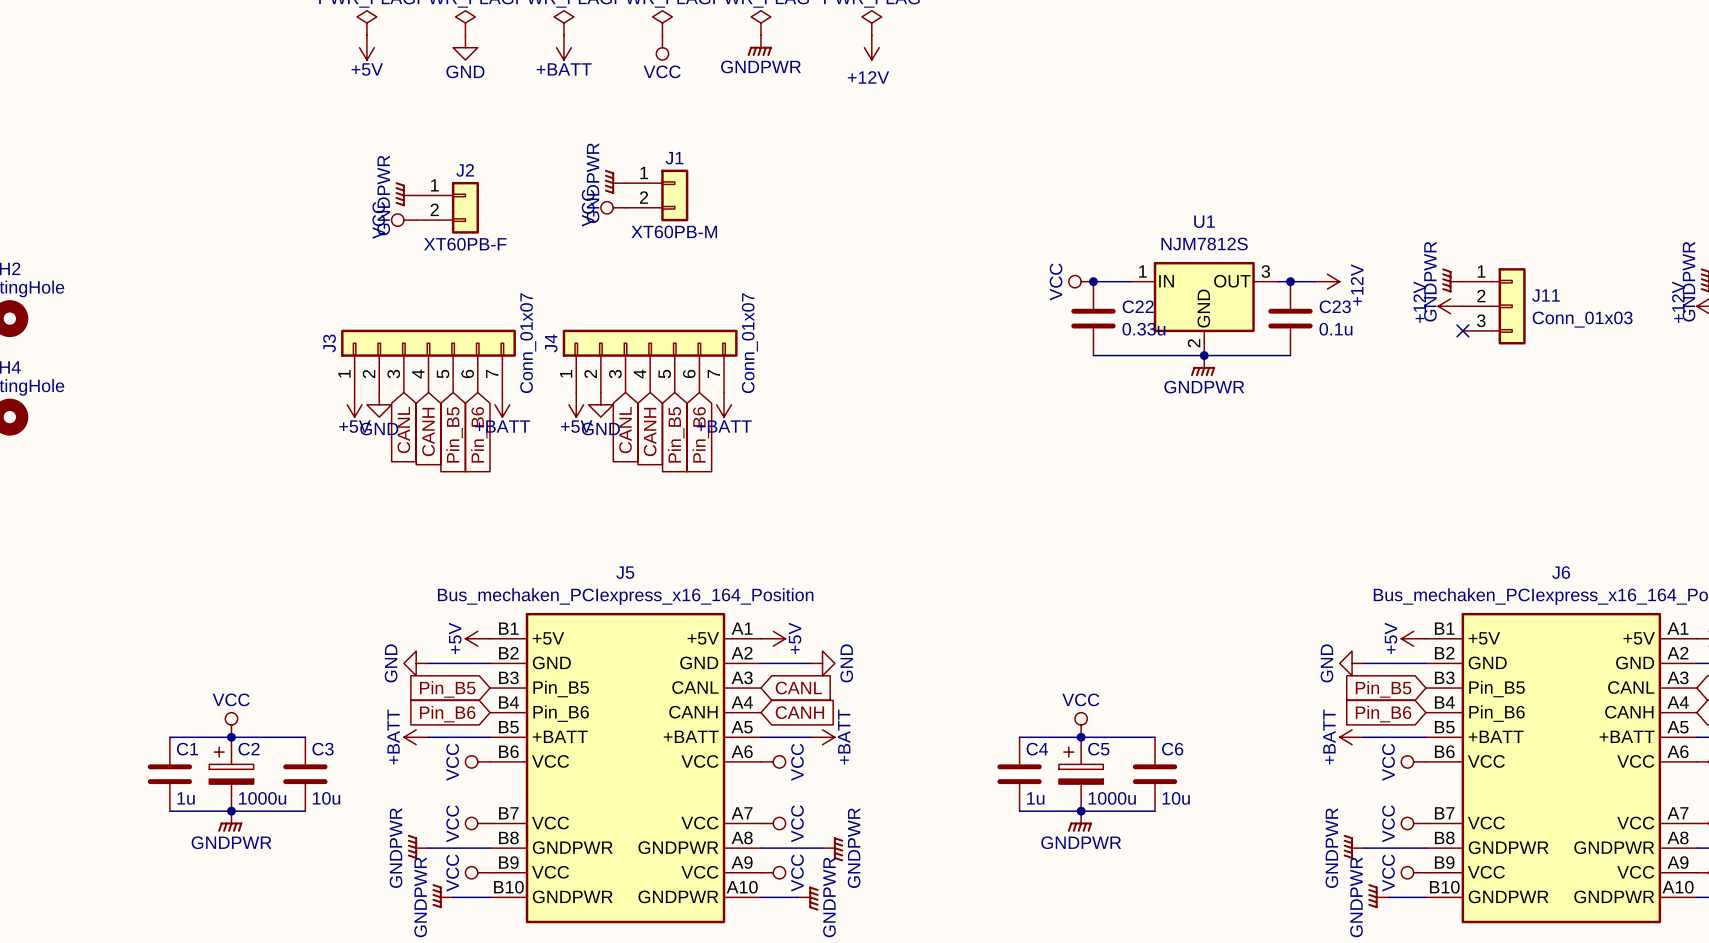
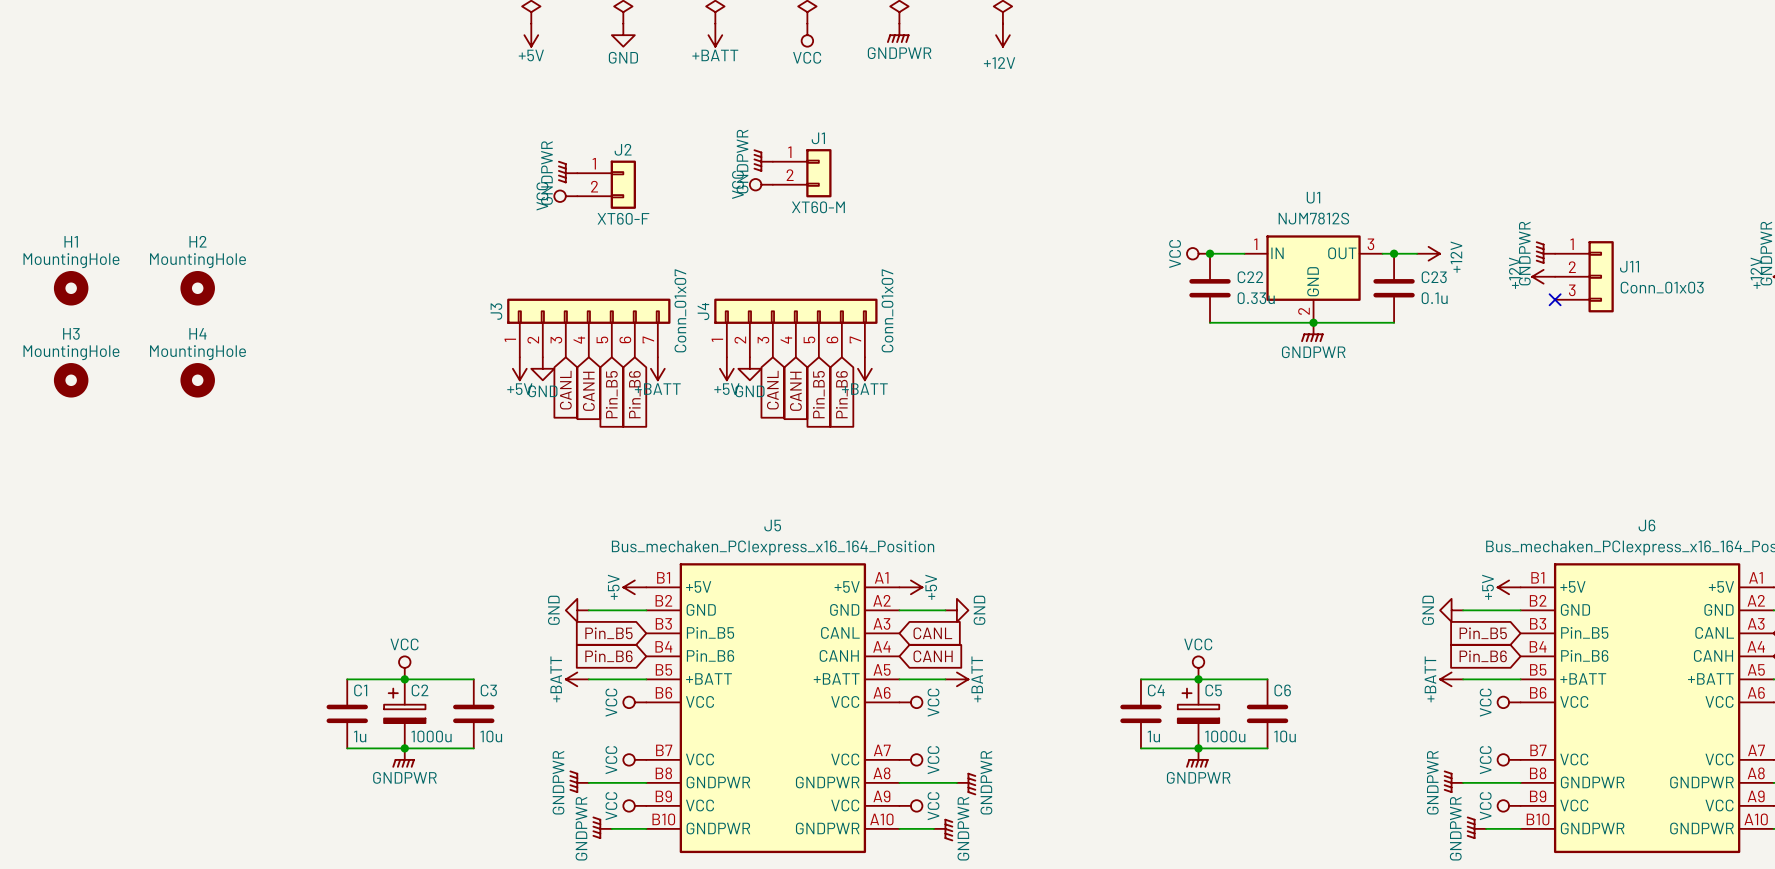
J1 value: XT60PB-M (674, 231) -> XT60-M (818, 207)
J2 value: XT60PB-F (465, 244) -> XT60-F (623, 218)

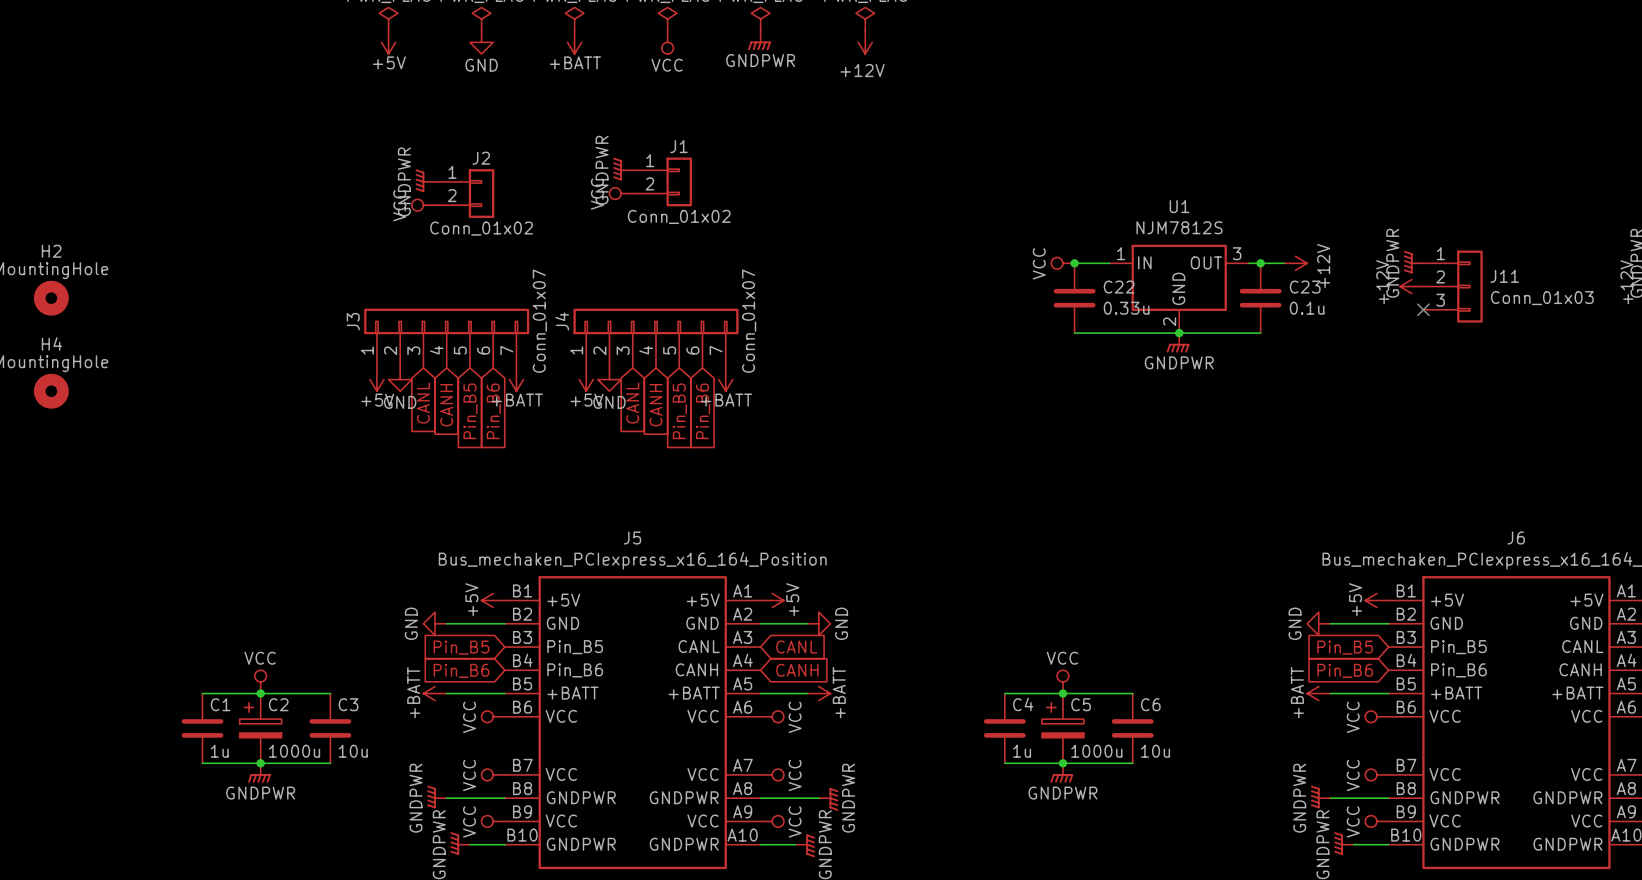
J1 value: XT60-M (818, 207) -> Conn_01x02 (679, 216)
J2 value: XT60-F (623, 218) -> Conn_01x02 (481, 228)

